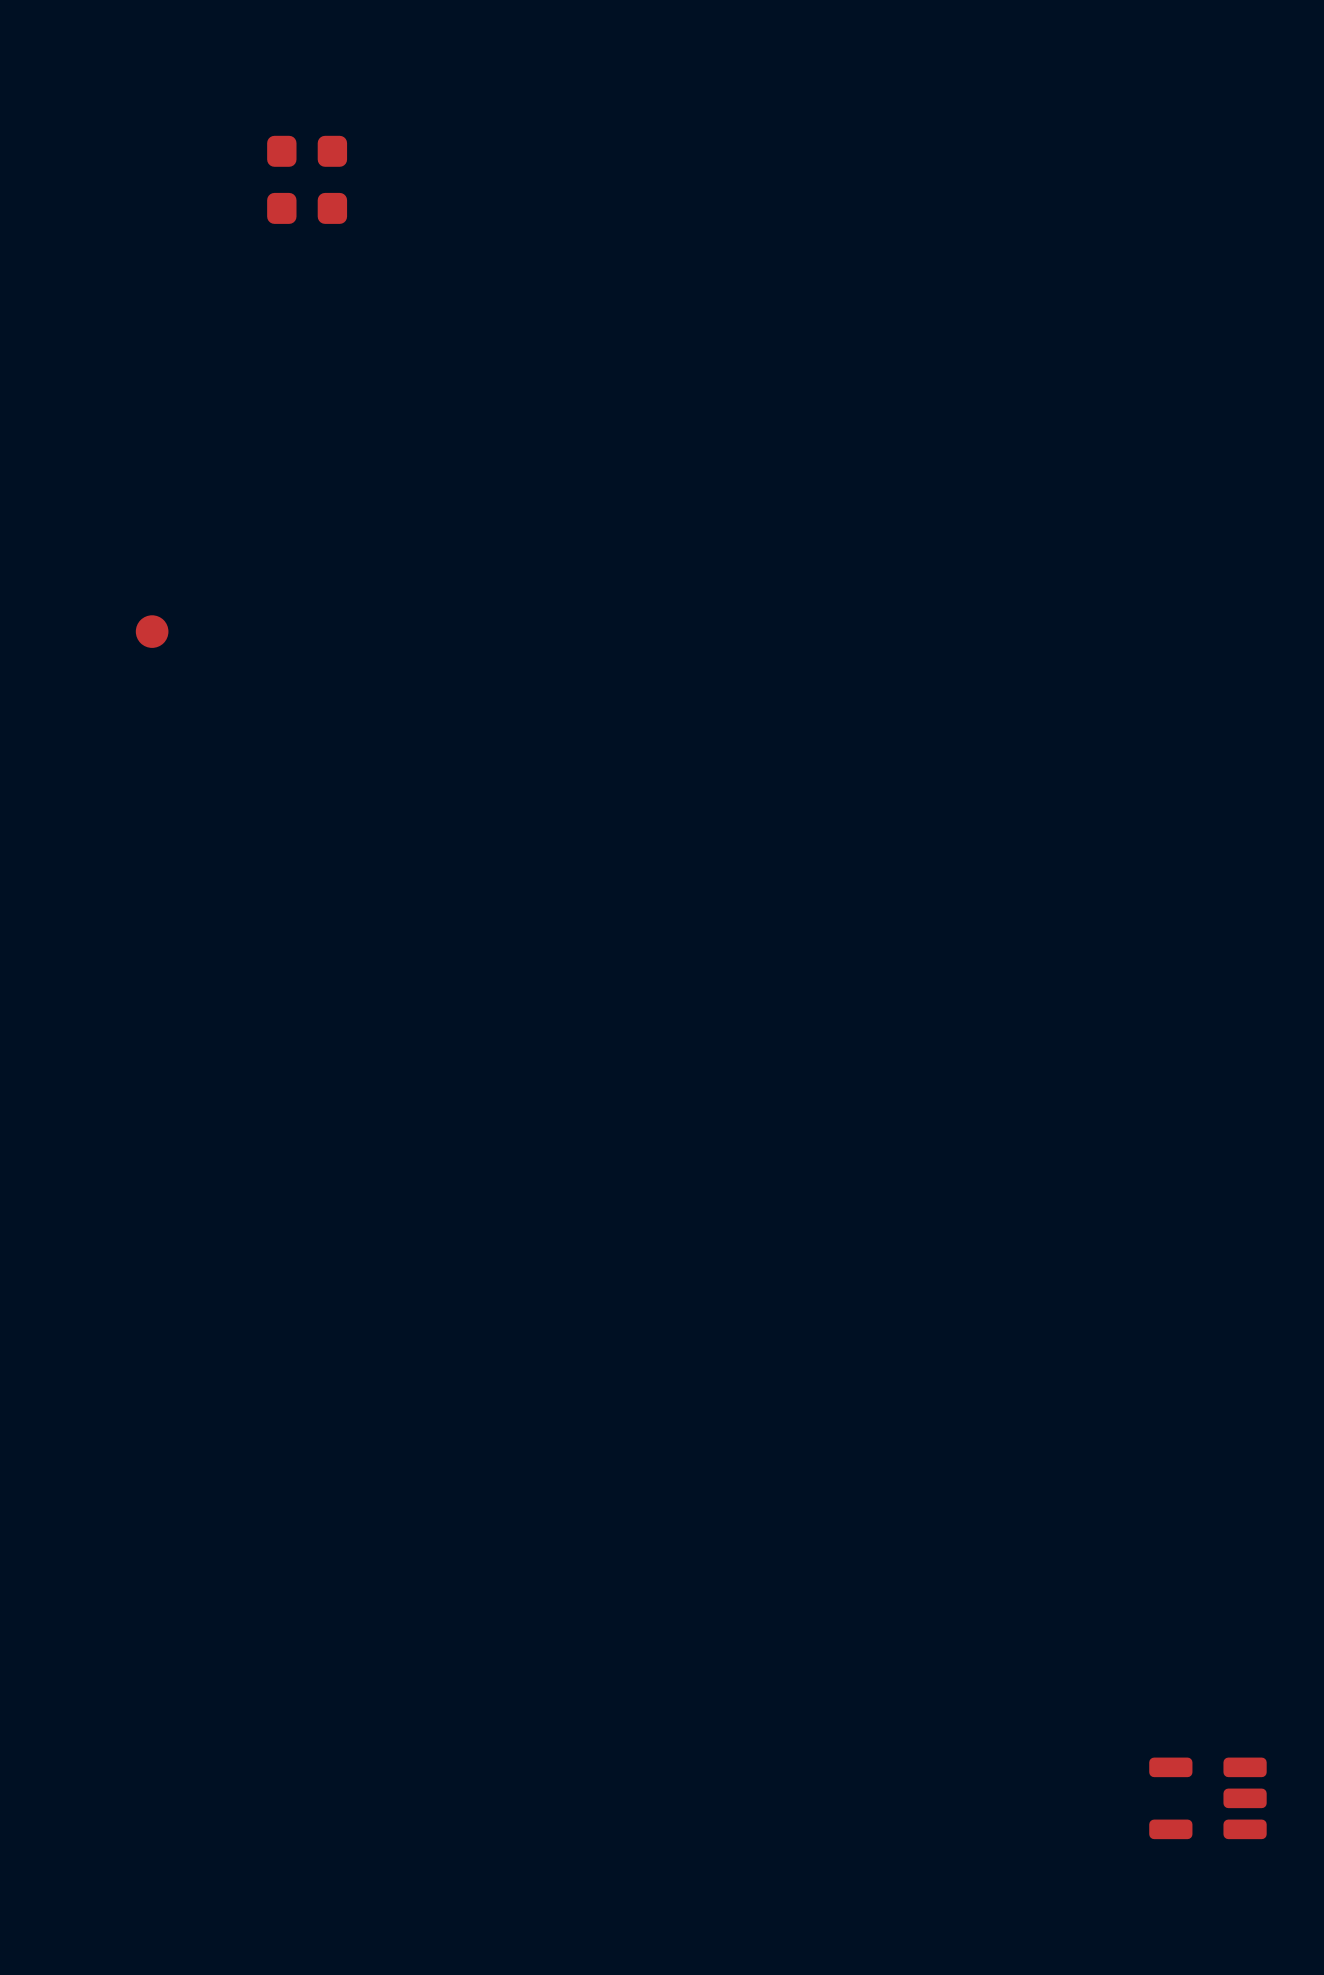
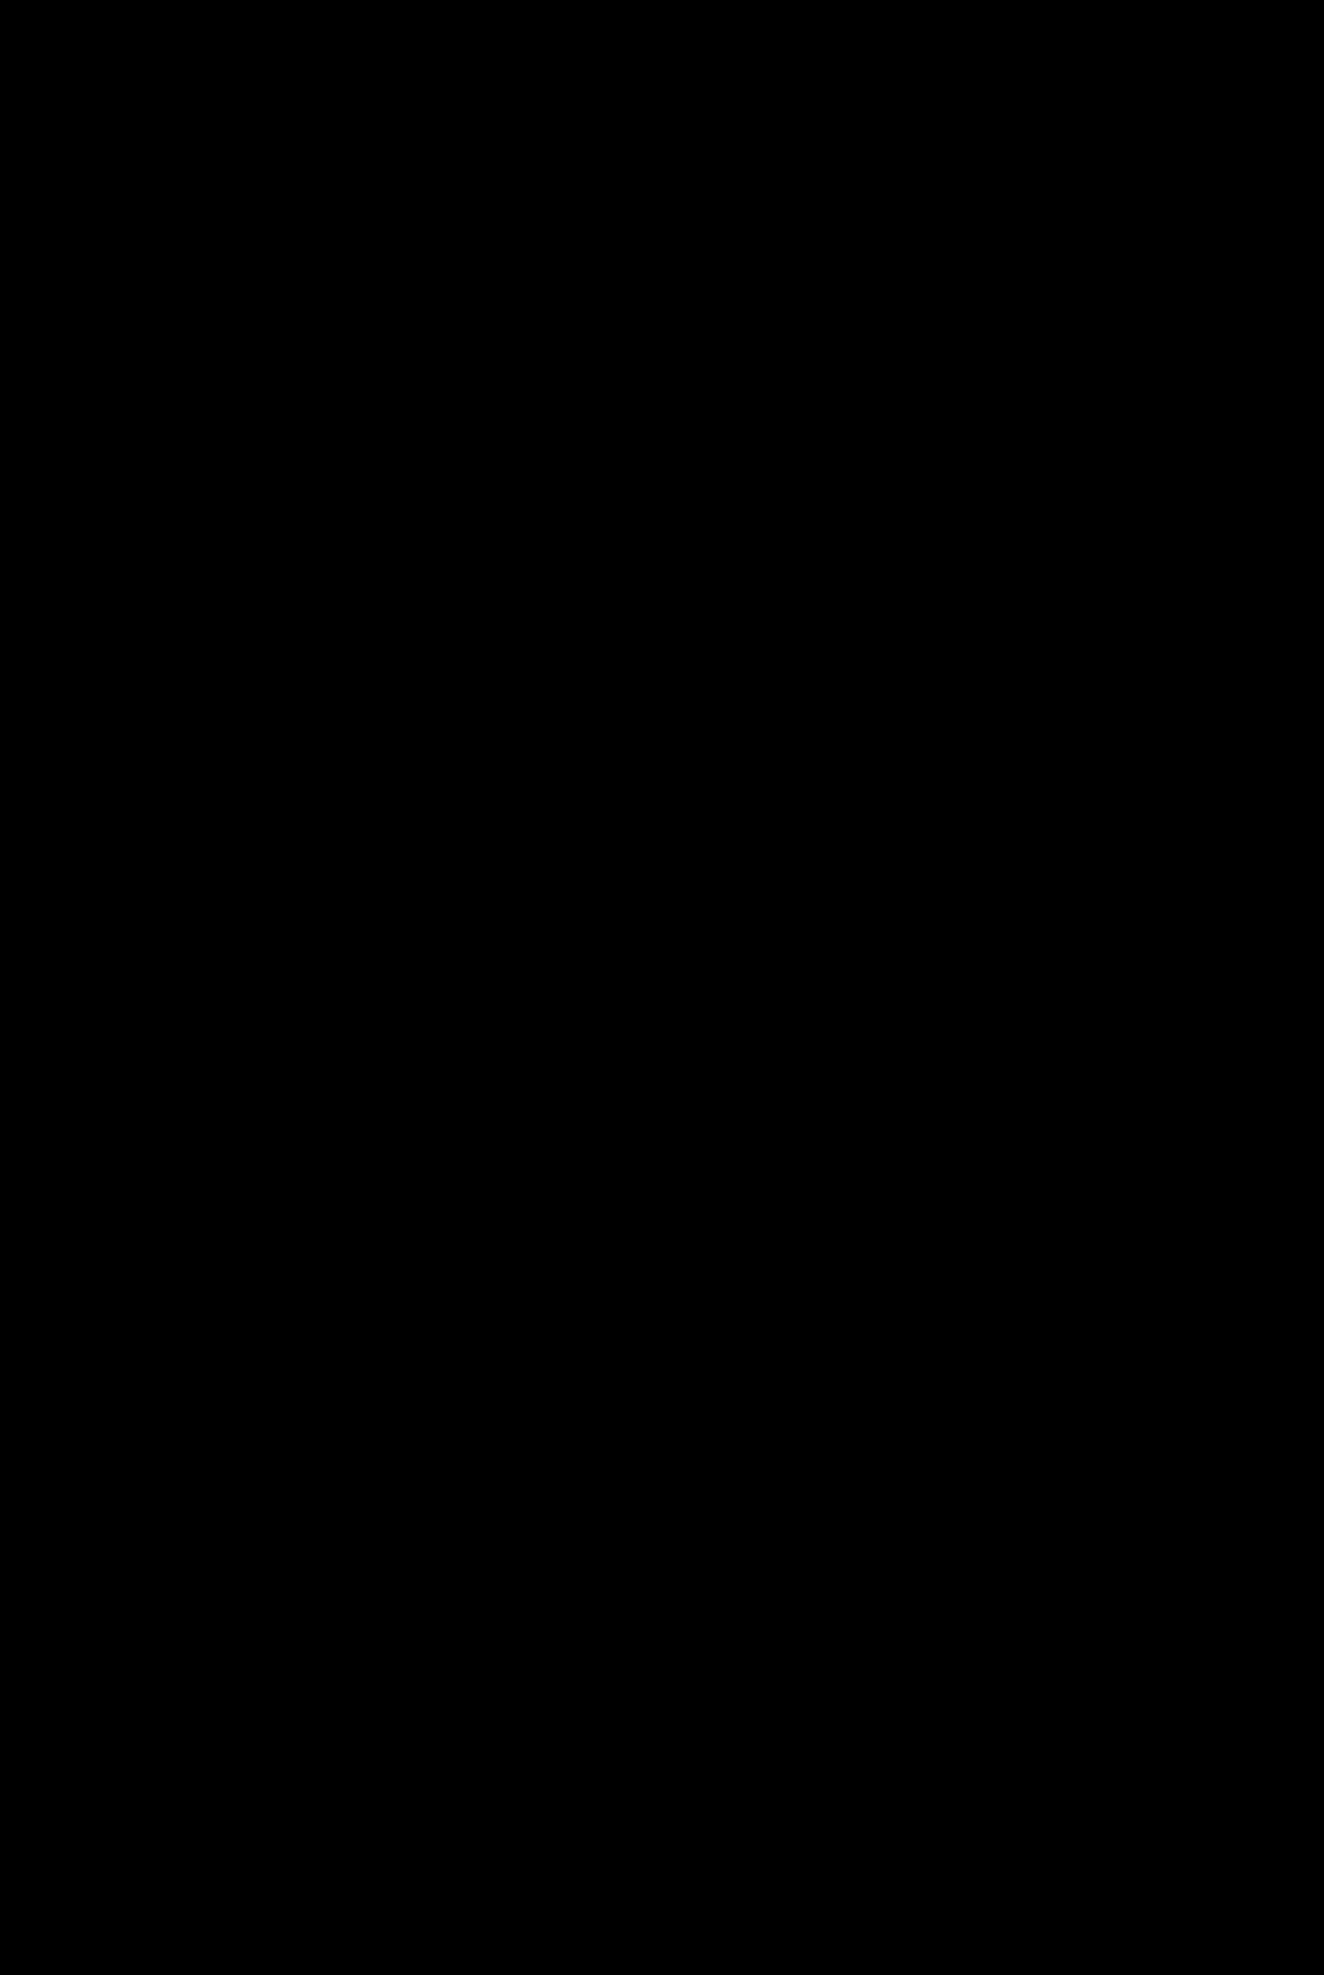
part: (307, 151) -> none
part: (307, 208) -> none
part: (152, 631) -> none
part: (1207, 1798) -> none

